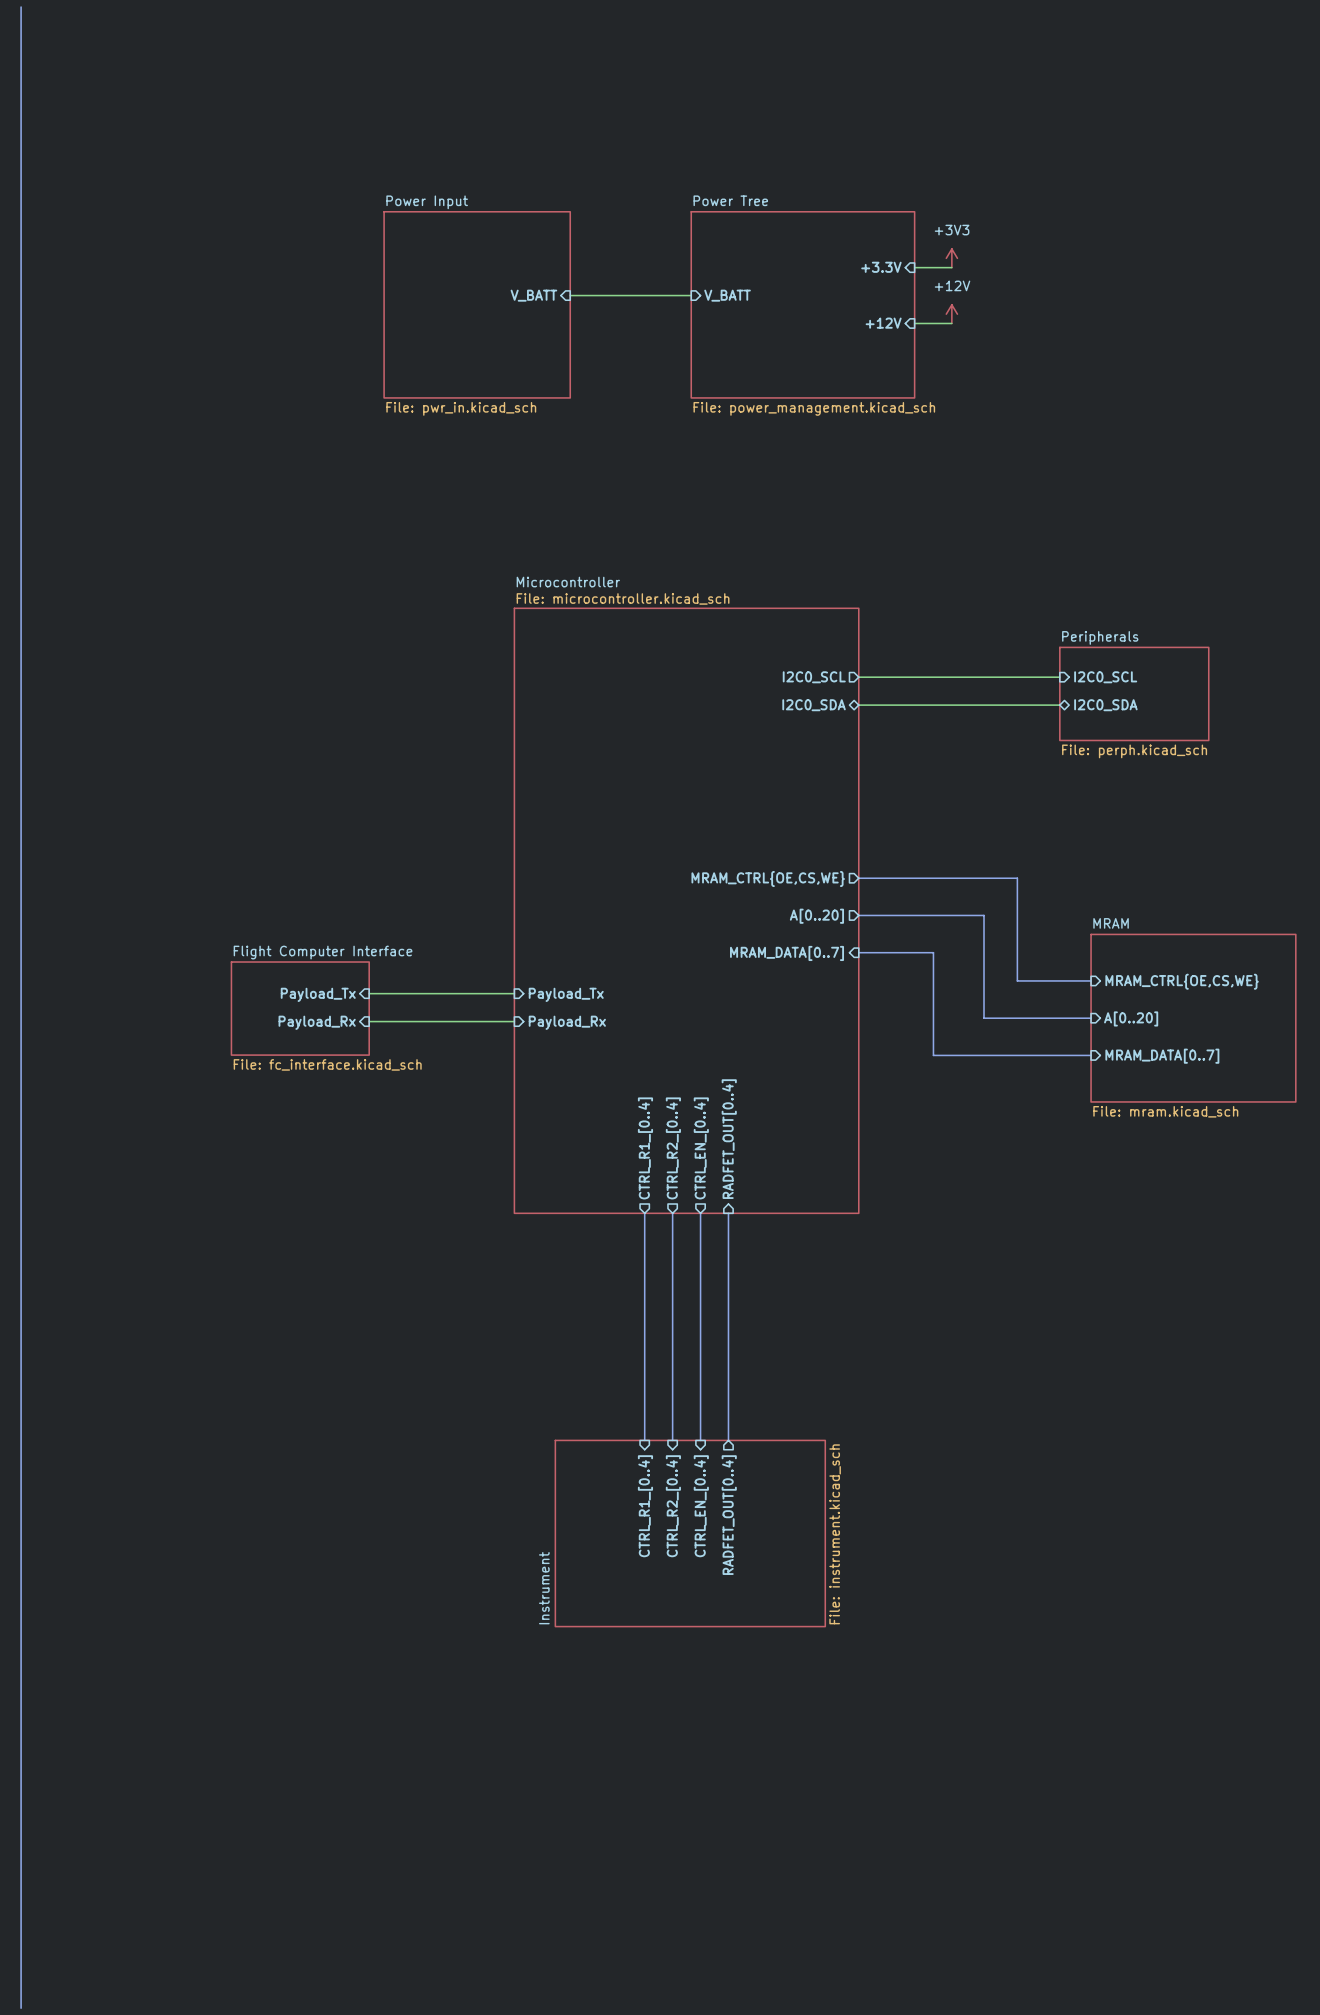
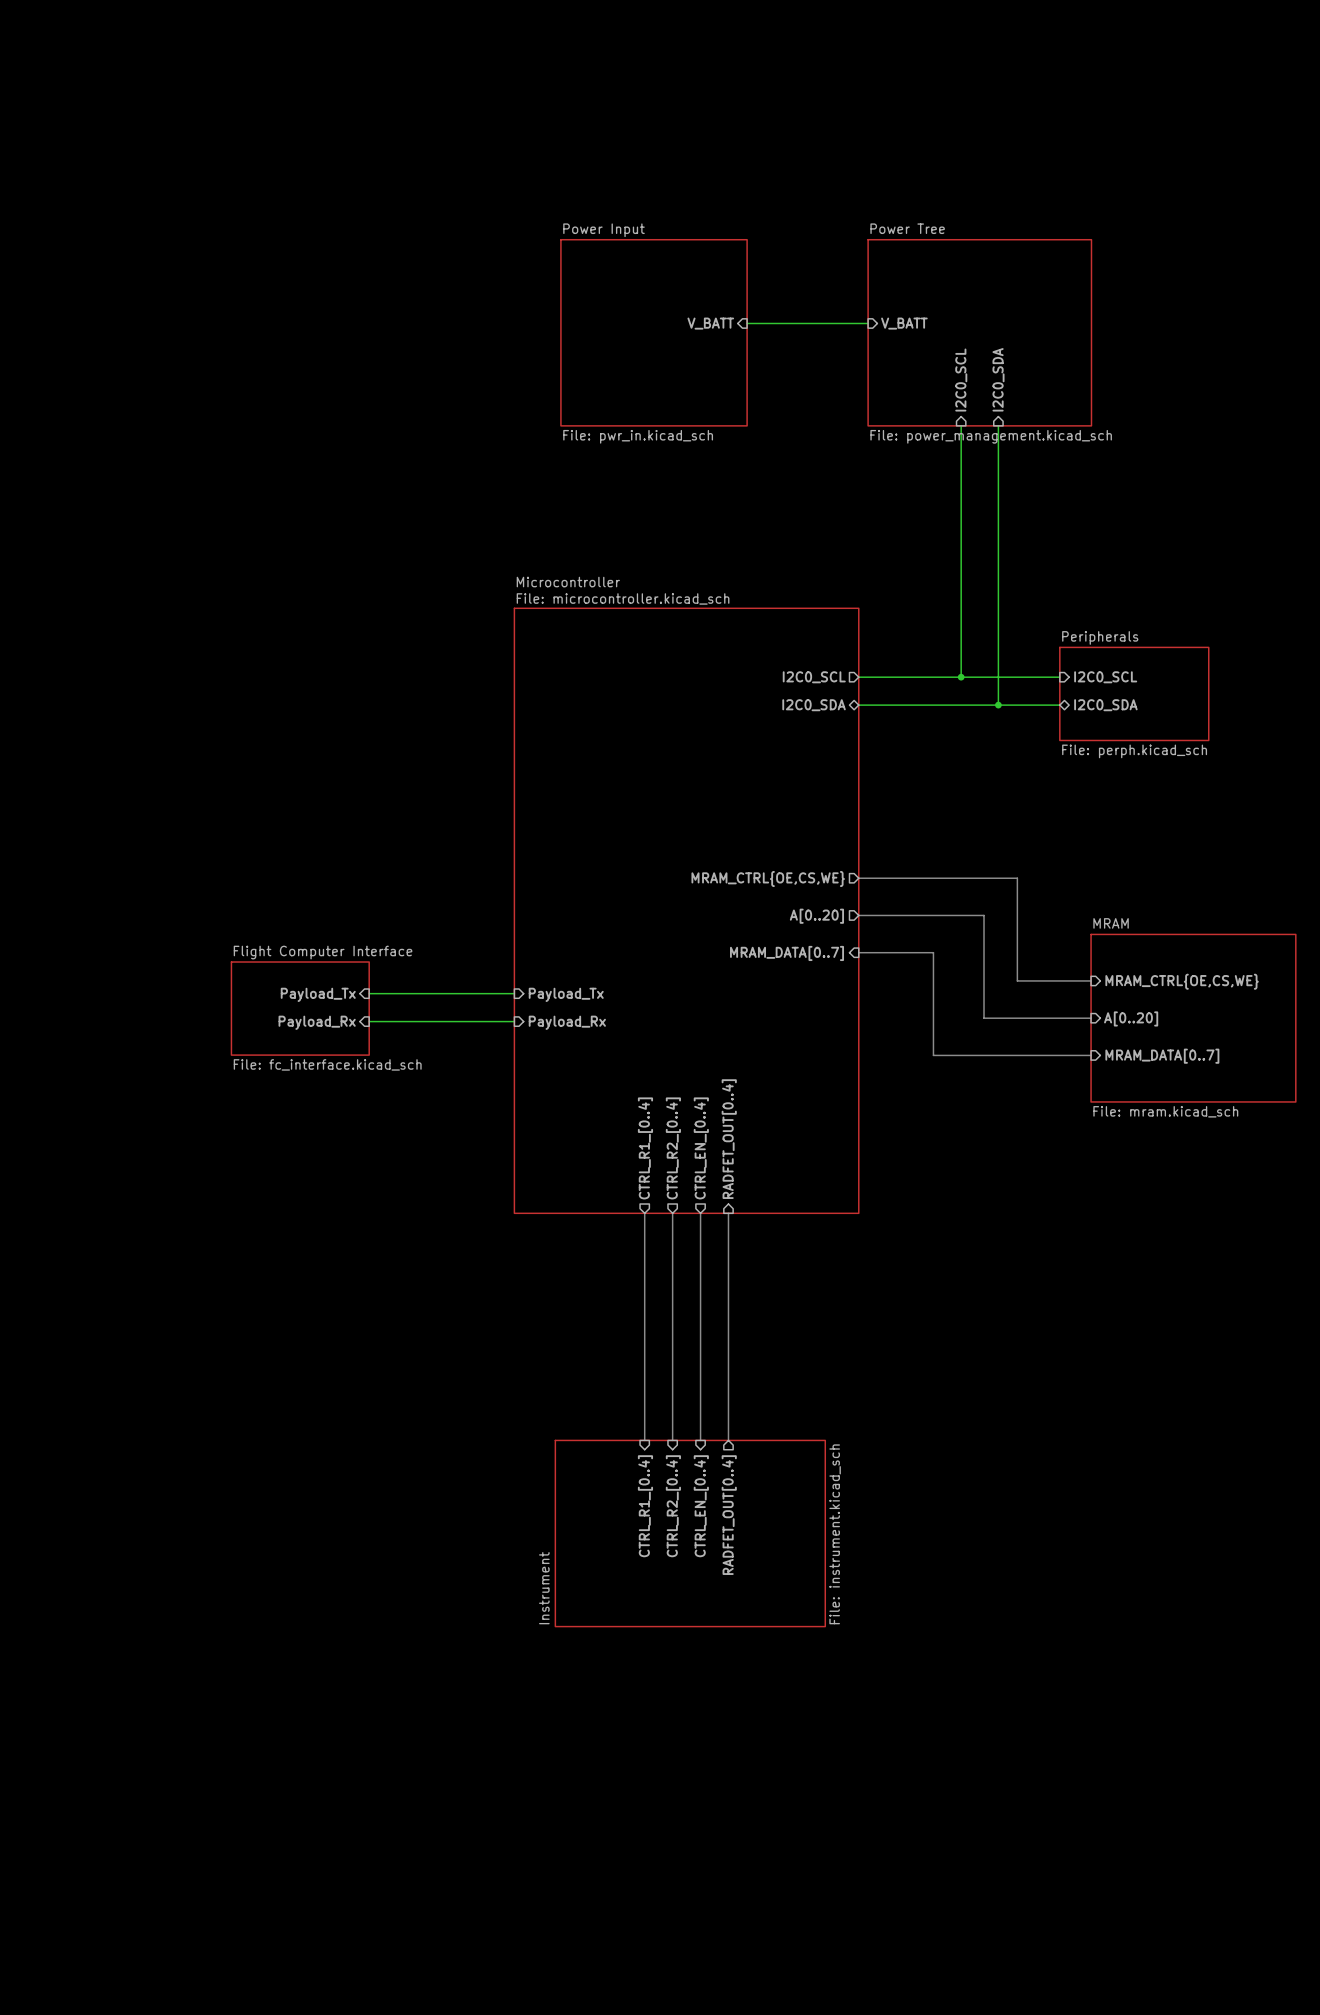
bus: (21, 7) (21, 2008) -> none
power symbol: +3V3 (951, 258) -> none
sheet pin: +3.3V (881, 267) -> none
wire: (914, 267) (951, 267) -> none
sheet pin: V_BATT (533, 295) -> none
wire: (570, 295) (691, 295) -> (747, 323) (868, 323)
sheet pin rotation: 0° (727, 295) -> 180° (710, 323)
sheet Power Input position: (477, 304) -> (654, 332)
sheet Power Tree position: (802, 304) -> (979, 332)
power symbol: +12V (951, 314) -> none
sheet pin: +12V (883, 323) -> none
sheet pin: none -> V_BATT (904, 323)
wire: (914, 323) (951, 323) -> none
sheet pin: none -> I2C0_SDA (998, 379)
sheet pin: none -> I2C0_SCL (961, 380)
wire: none -> (961, 425) (961, 677)
wire: none -> (998, 425) (998, 705)
junction: none -> (961, 677)
junction: none -> (998, 705)

